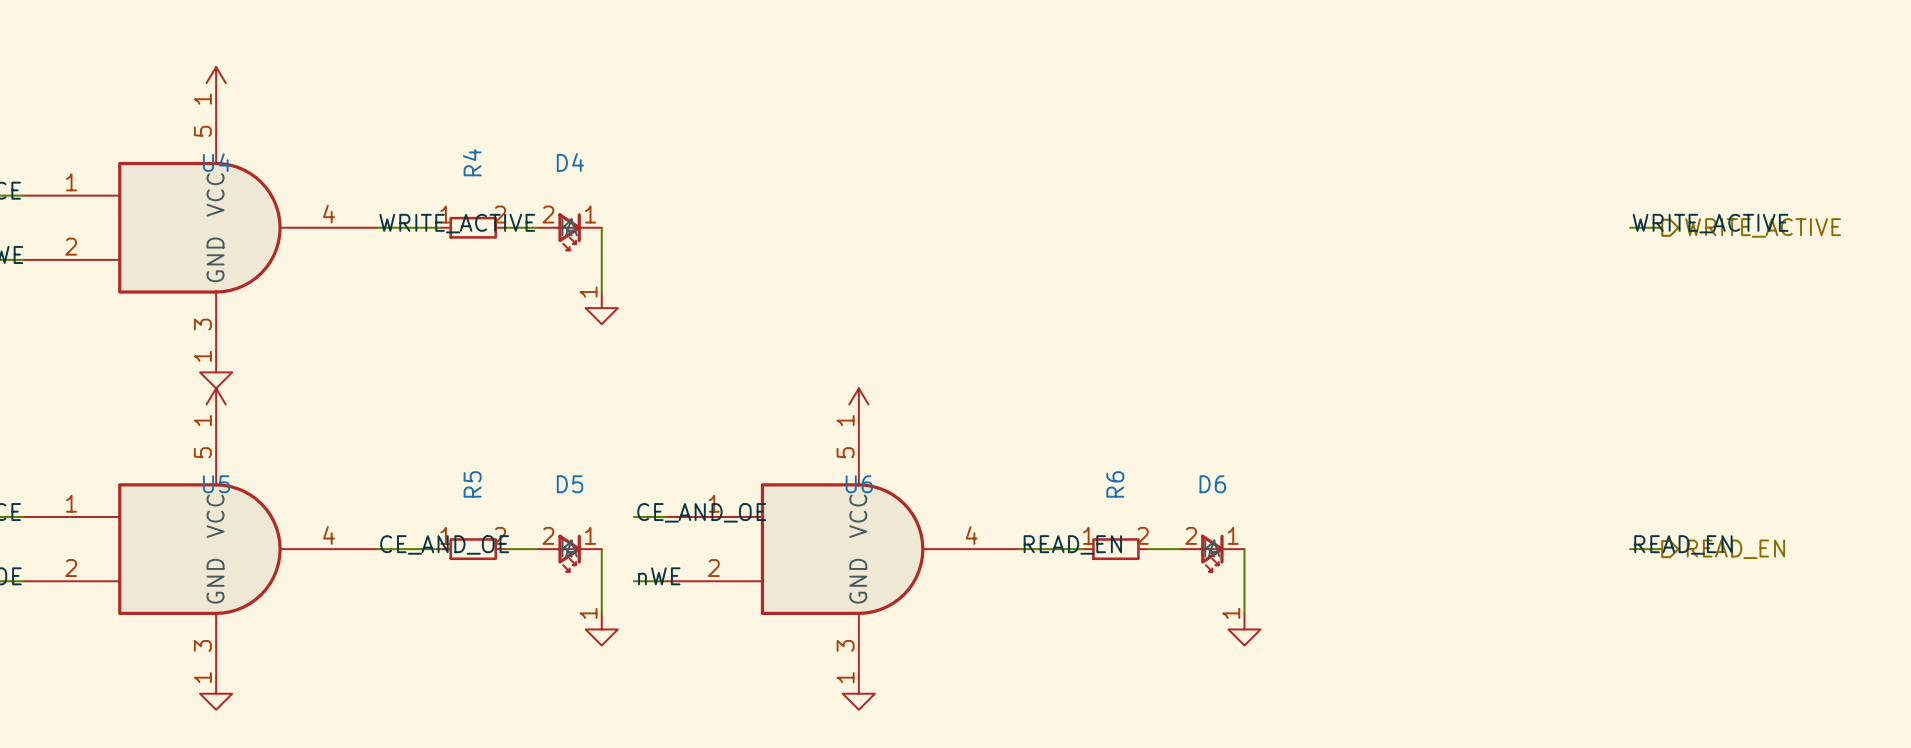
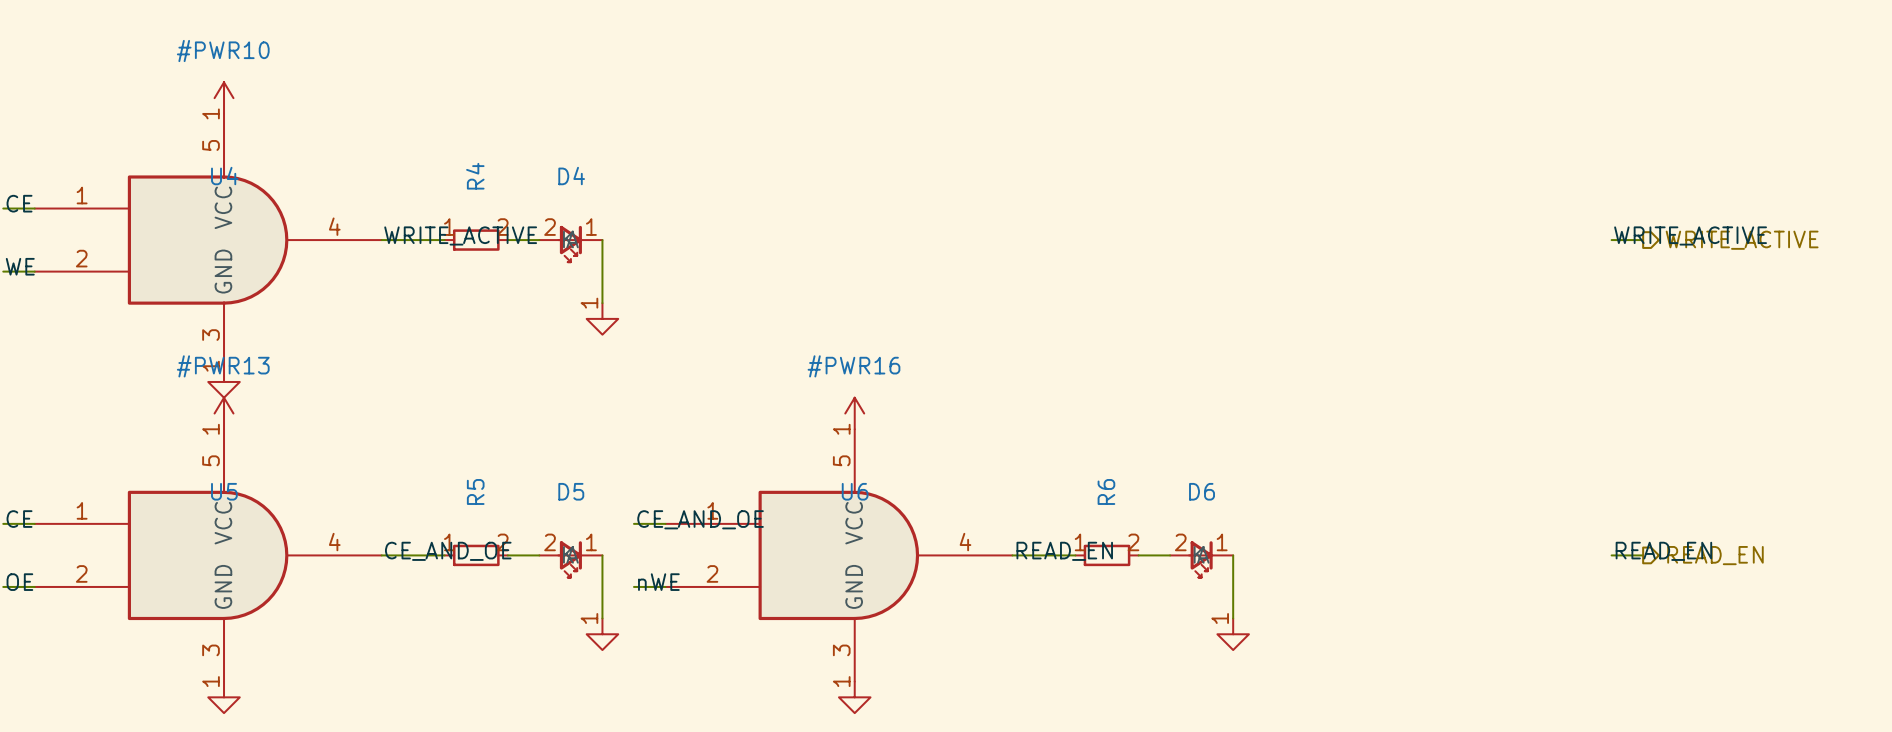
#PWR10 name: none -> #PWR10 (223, 51)
#PWR13 name: none -> #PWR13 (223, 366)
#PWR16 name: none -> #PWR16 (853, 366)

